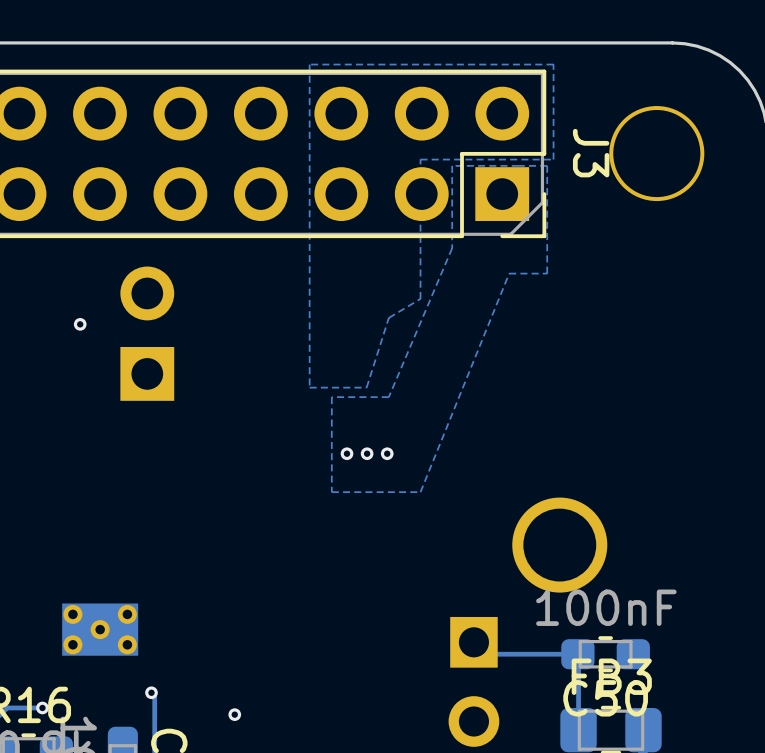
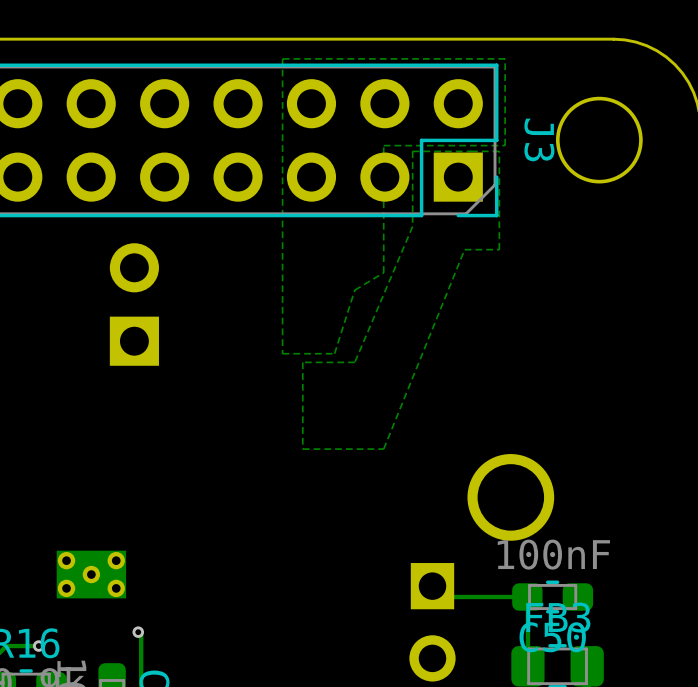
via: (80, 324) -> none
via: (346, 453) -> none
via: (367, 453) -> none
via: (387, 453) -> none
via: (234, 714) -> none

